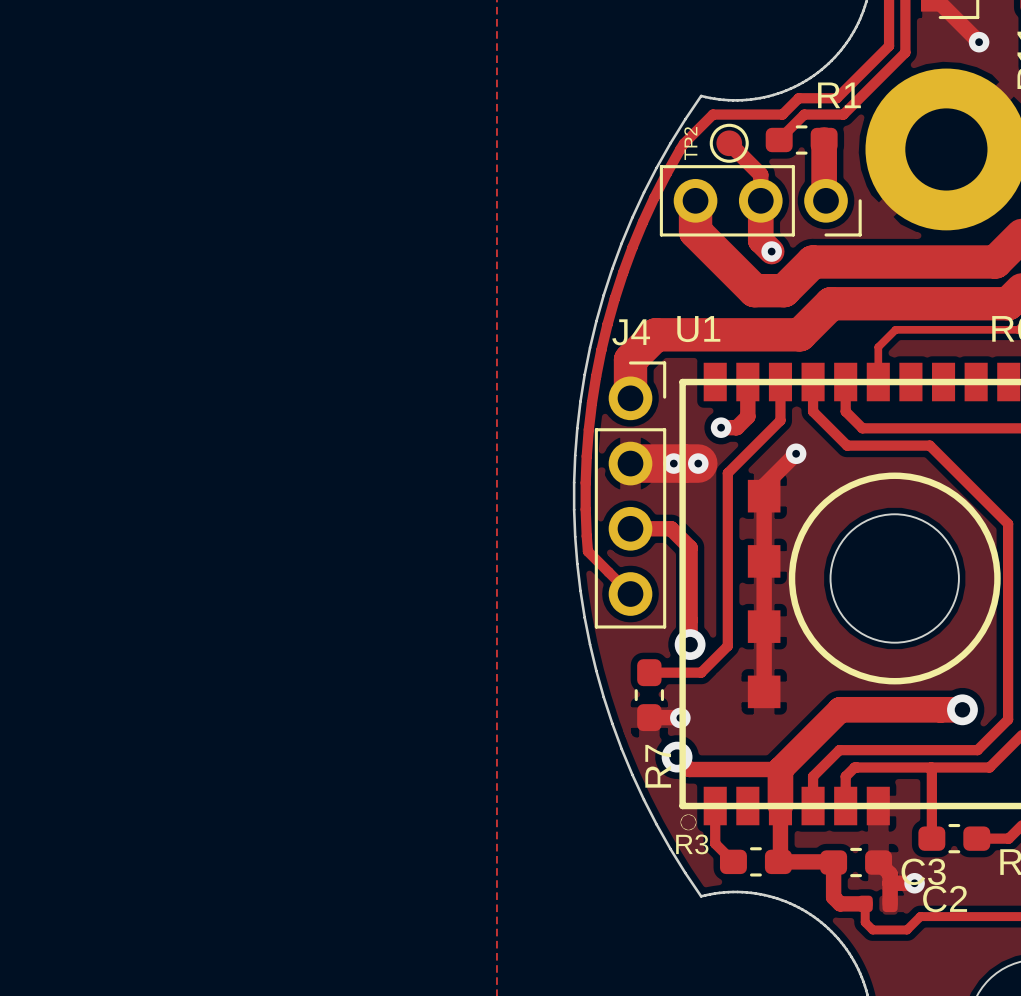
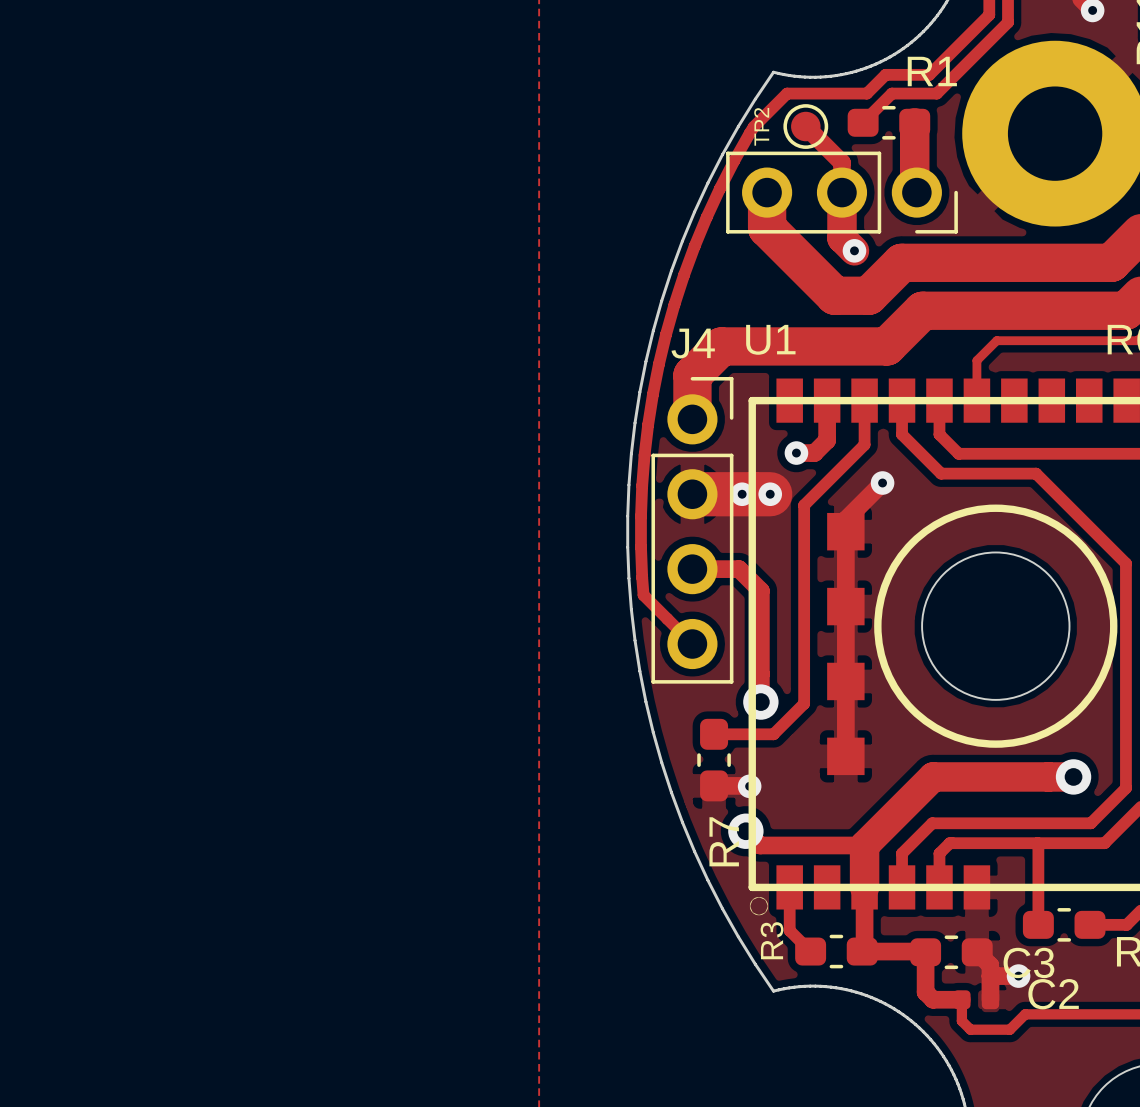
R3 name rotation: 0° (692, 844) -> 90° counterclockwise (772, 940)

